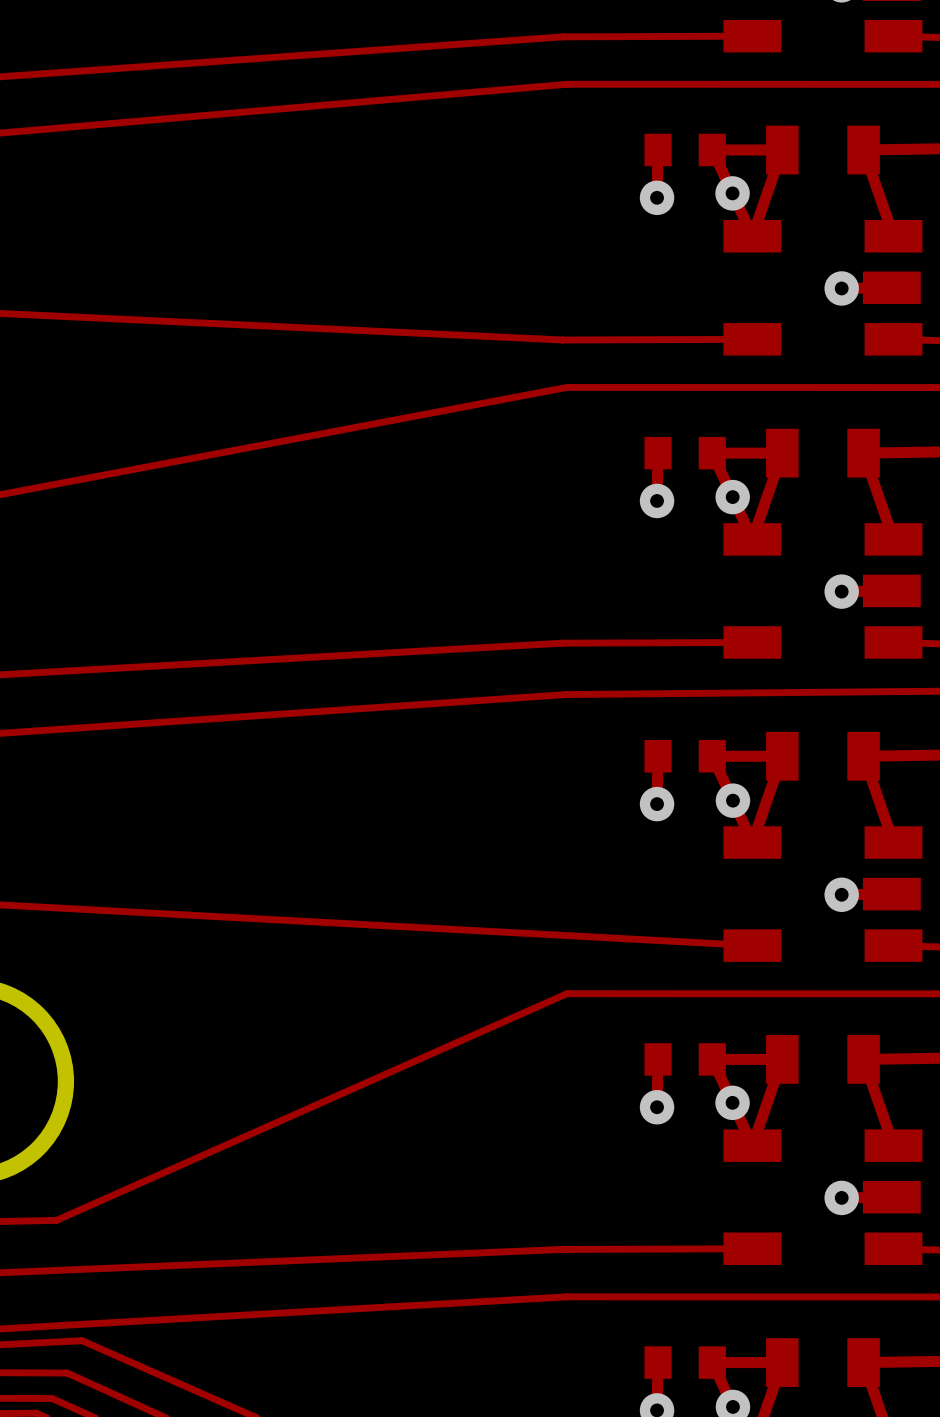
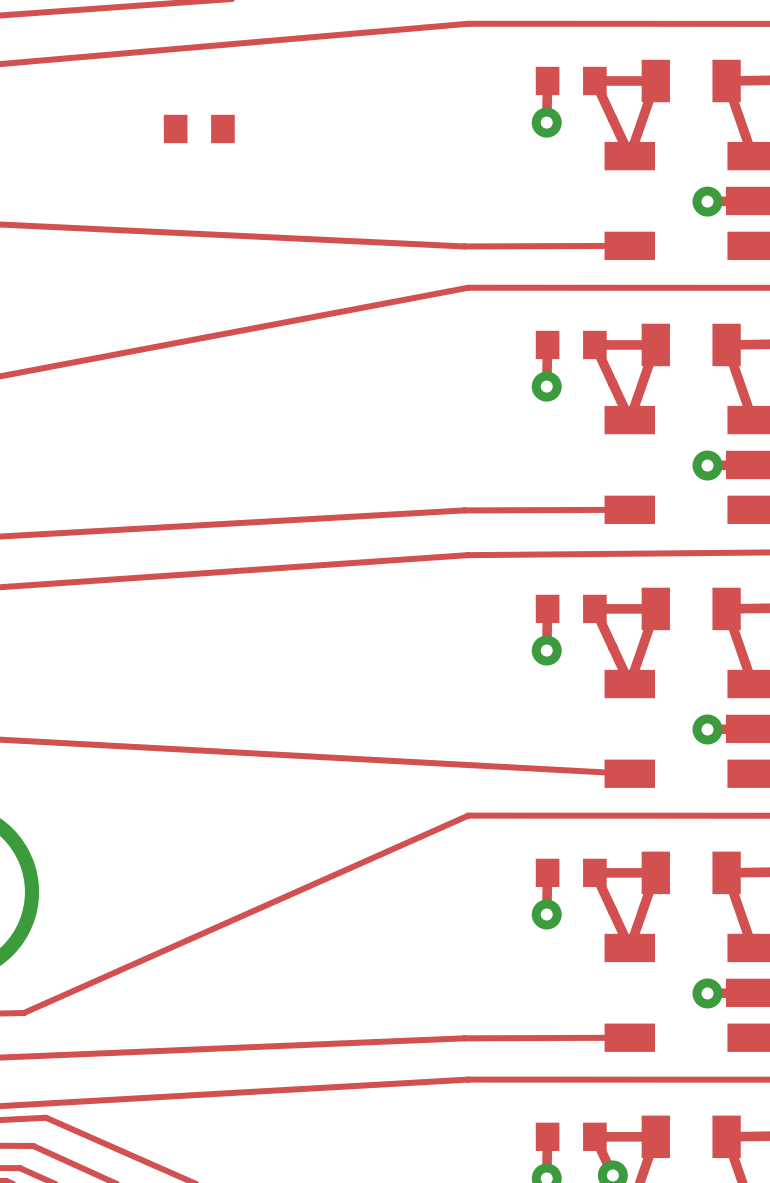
via: (732, 193) -> none
part: none -> (199, 128)
via: (732, 497) -> none
via: (732, 800) -> none
via: (732, 1102) -> none

